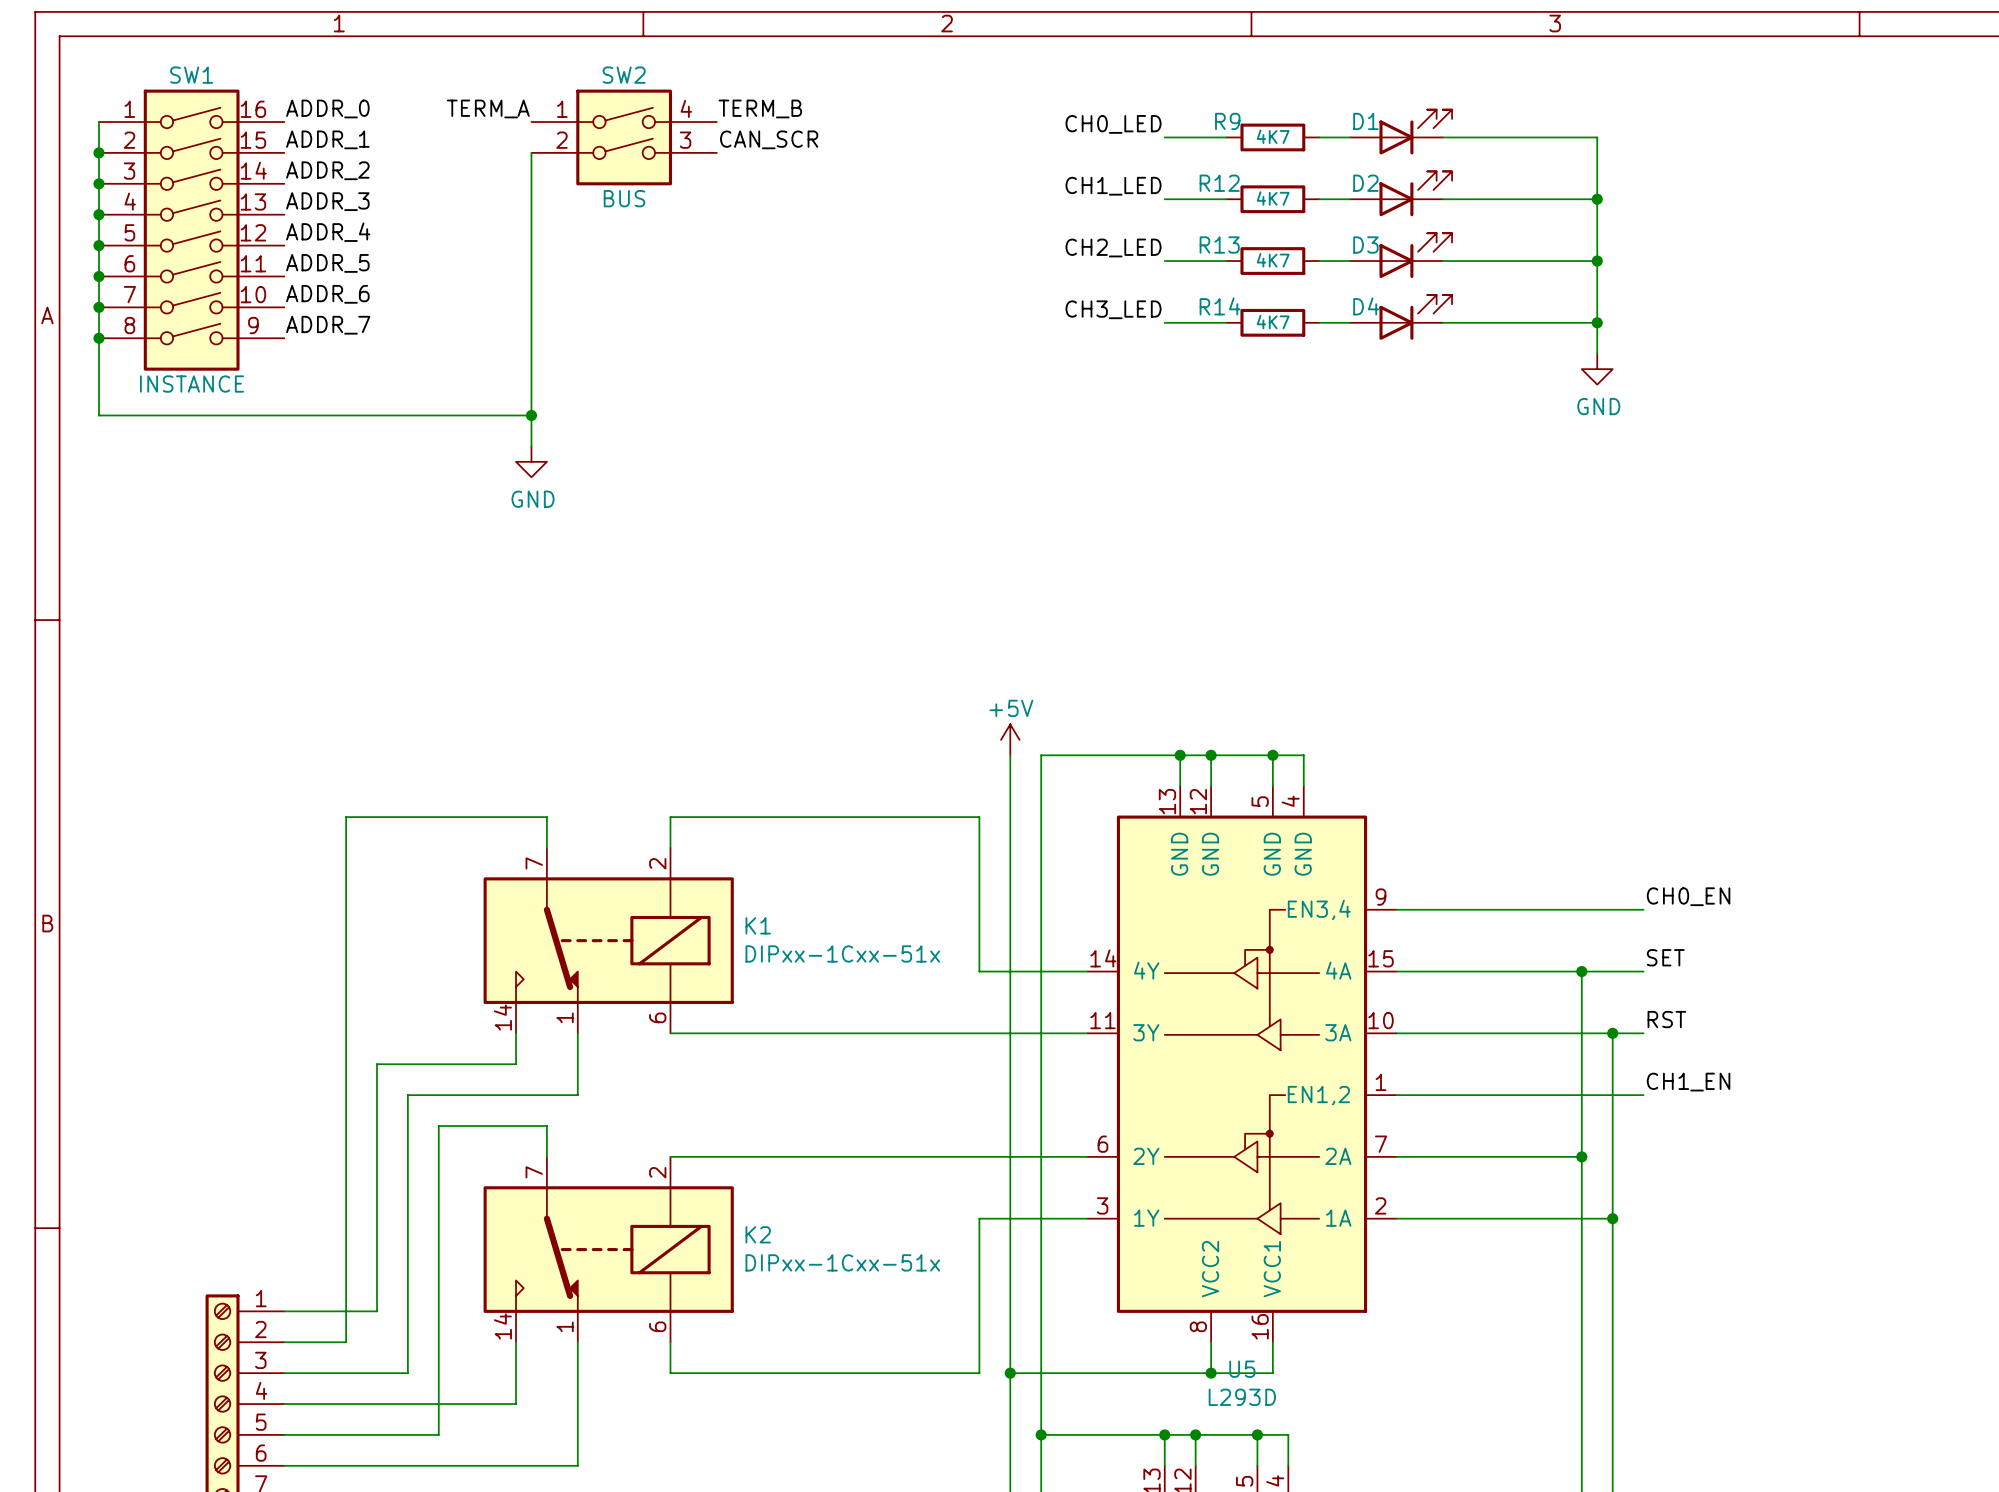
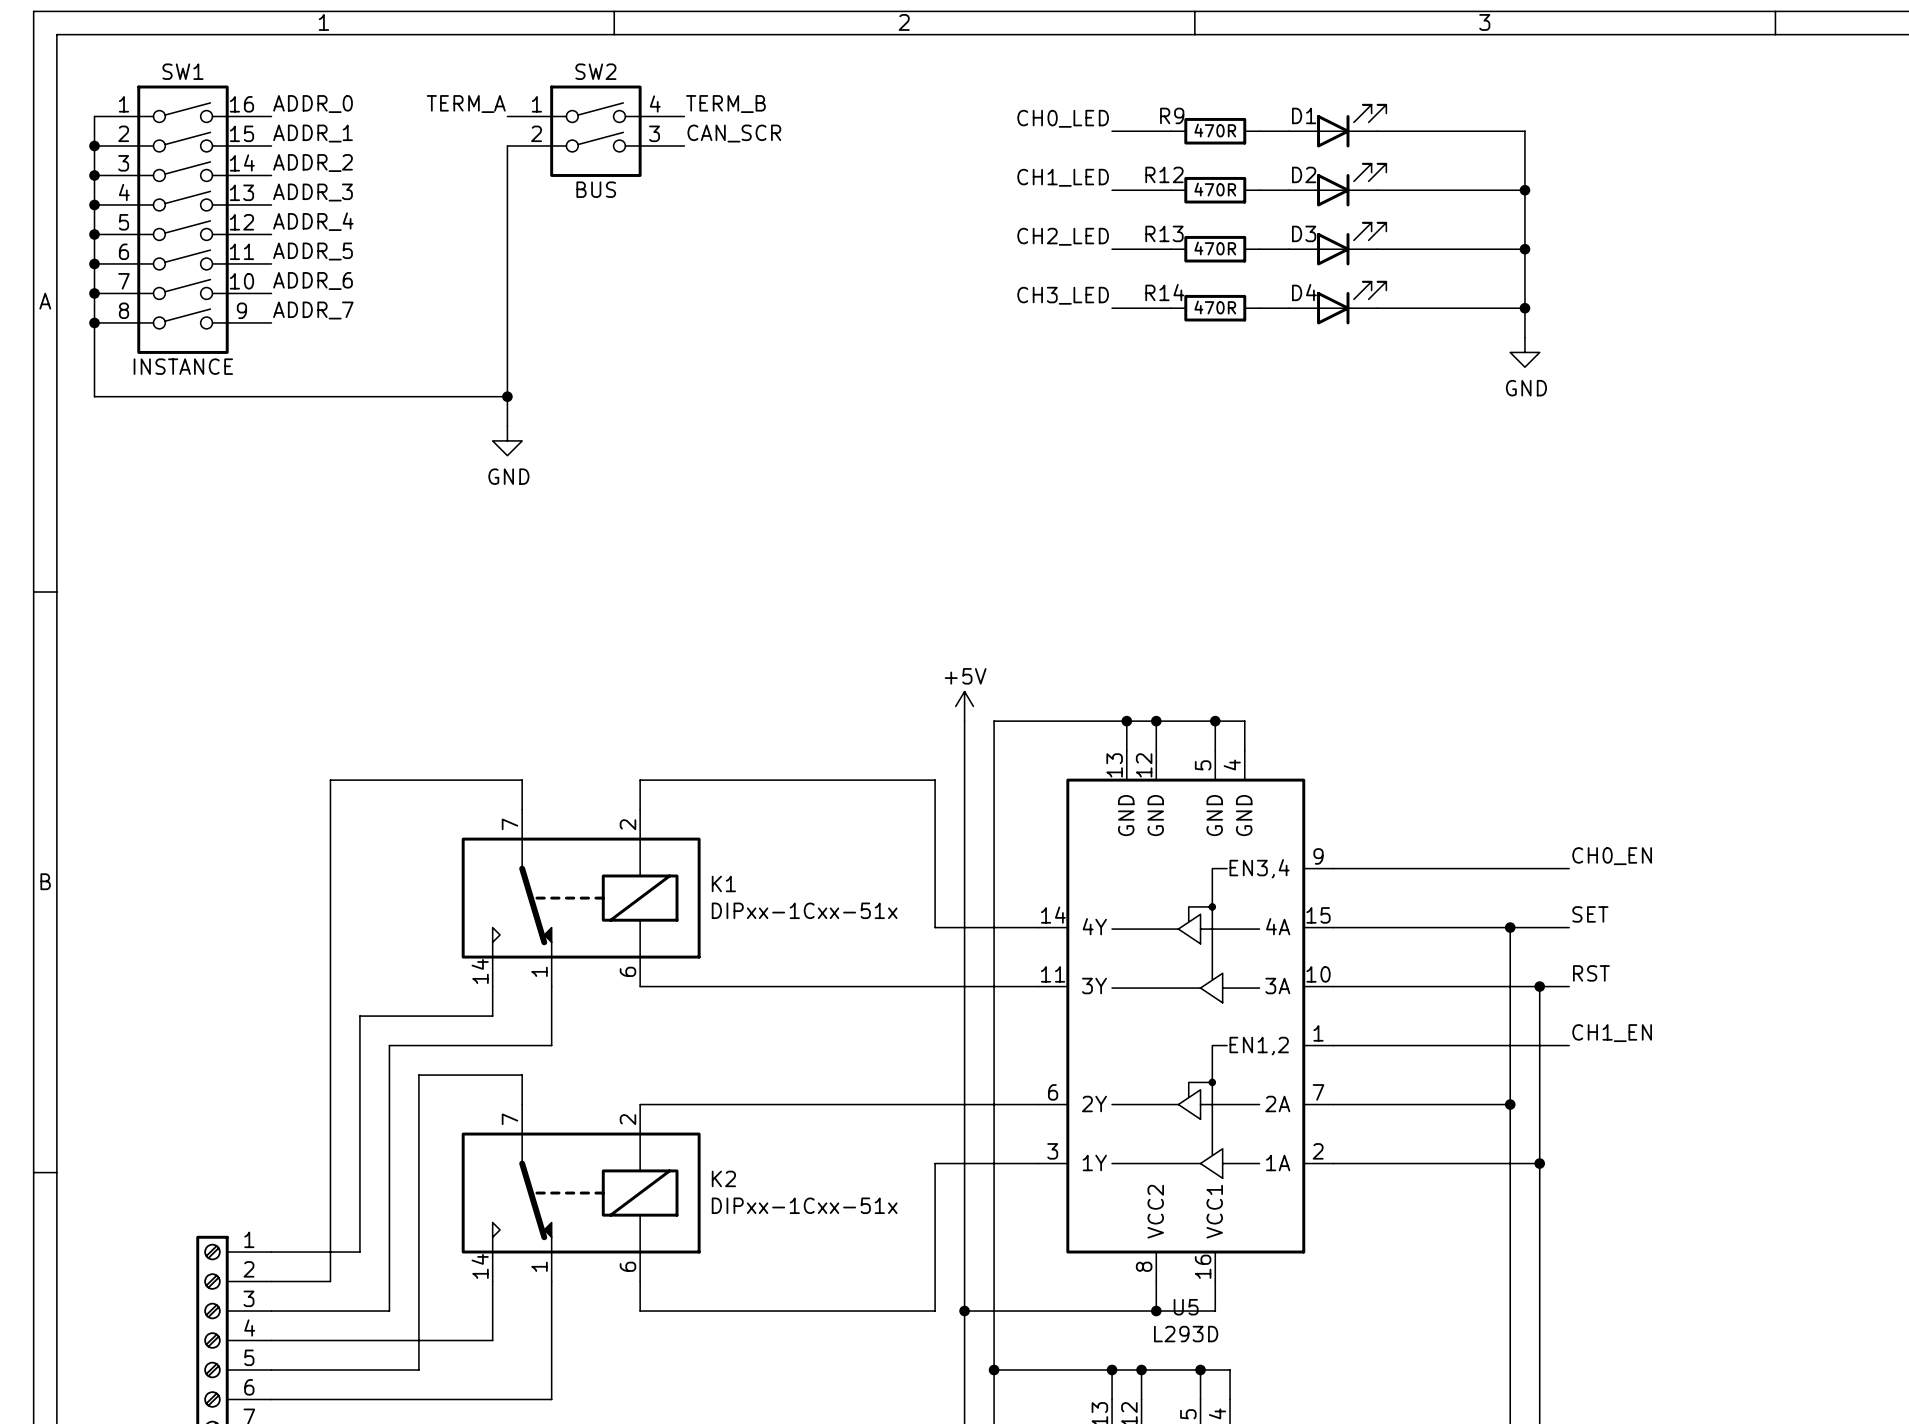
R9 value: 4K7 (1273, 136) -> 470R (1215, 130)
R12 value: 4K7 (1273, 198) -> 470R (1215, 189)
R13 value: 4K7 (1273, 260) -> 470R (1215, 248)
R14 value: 4K7 (1273, 322) -> 470R (1215, 307)

